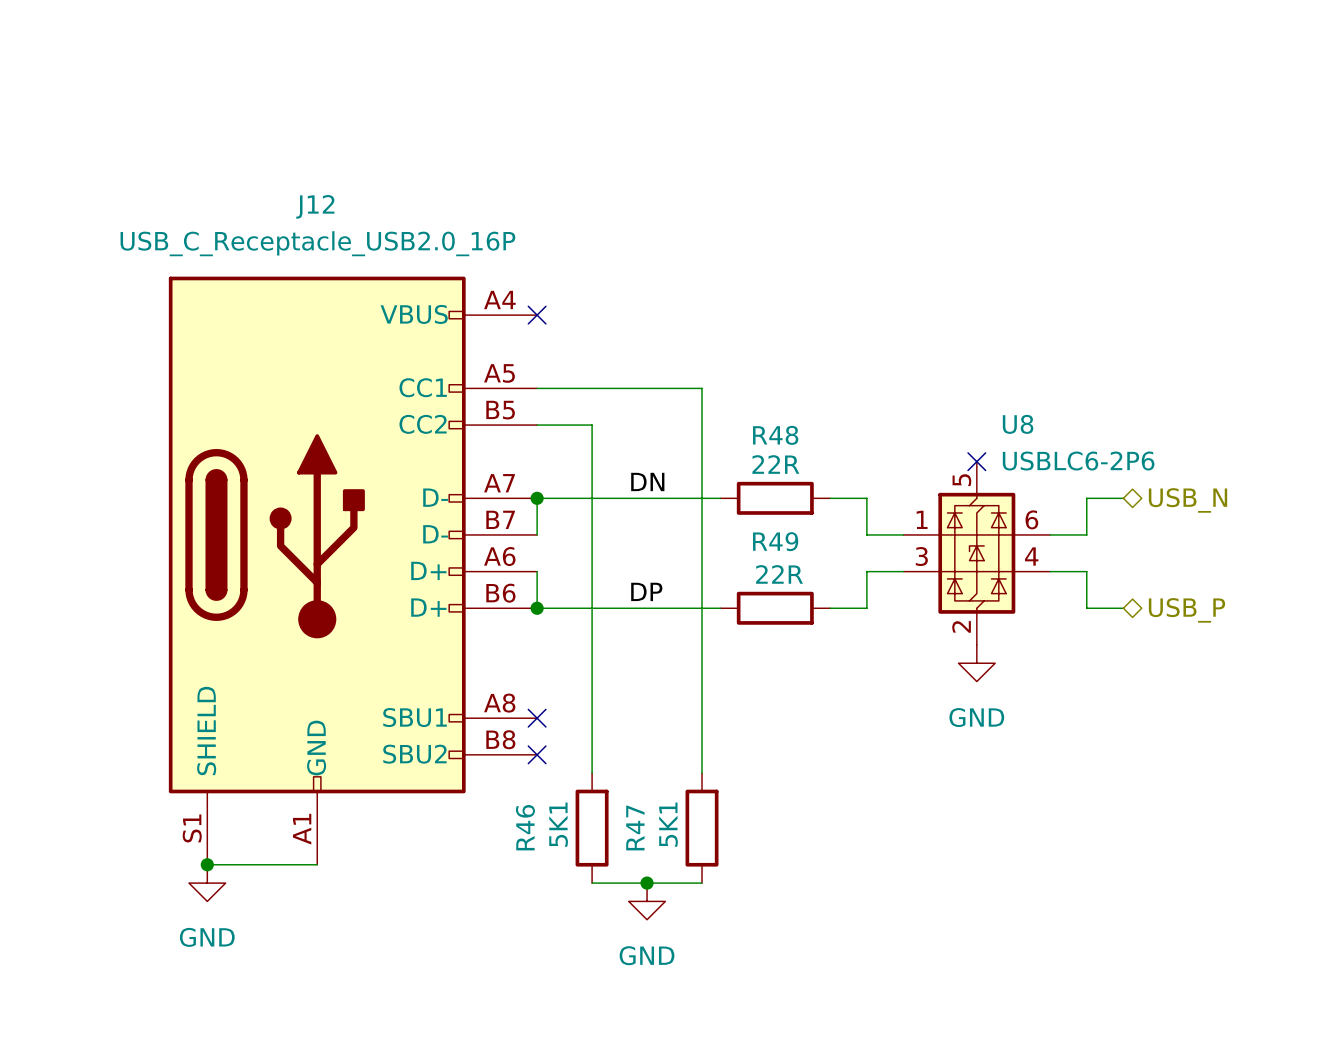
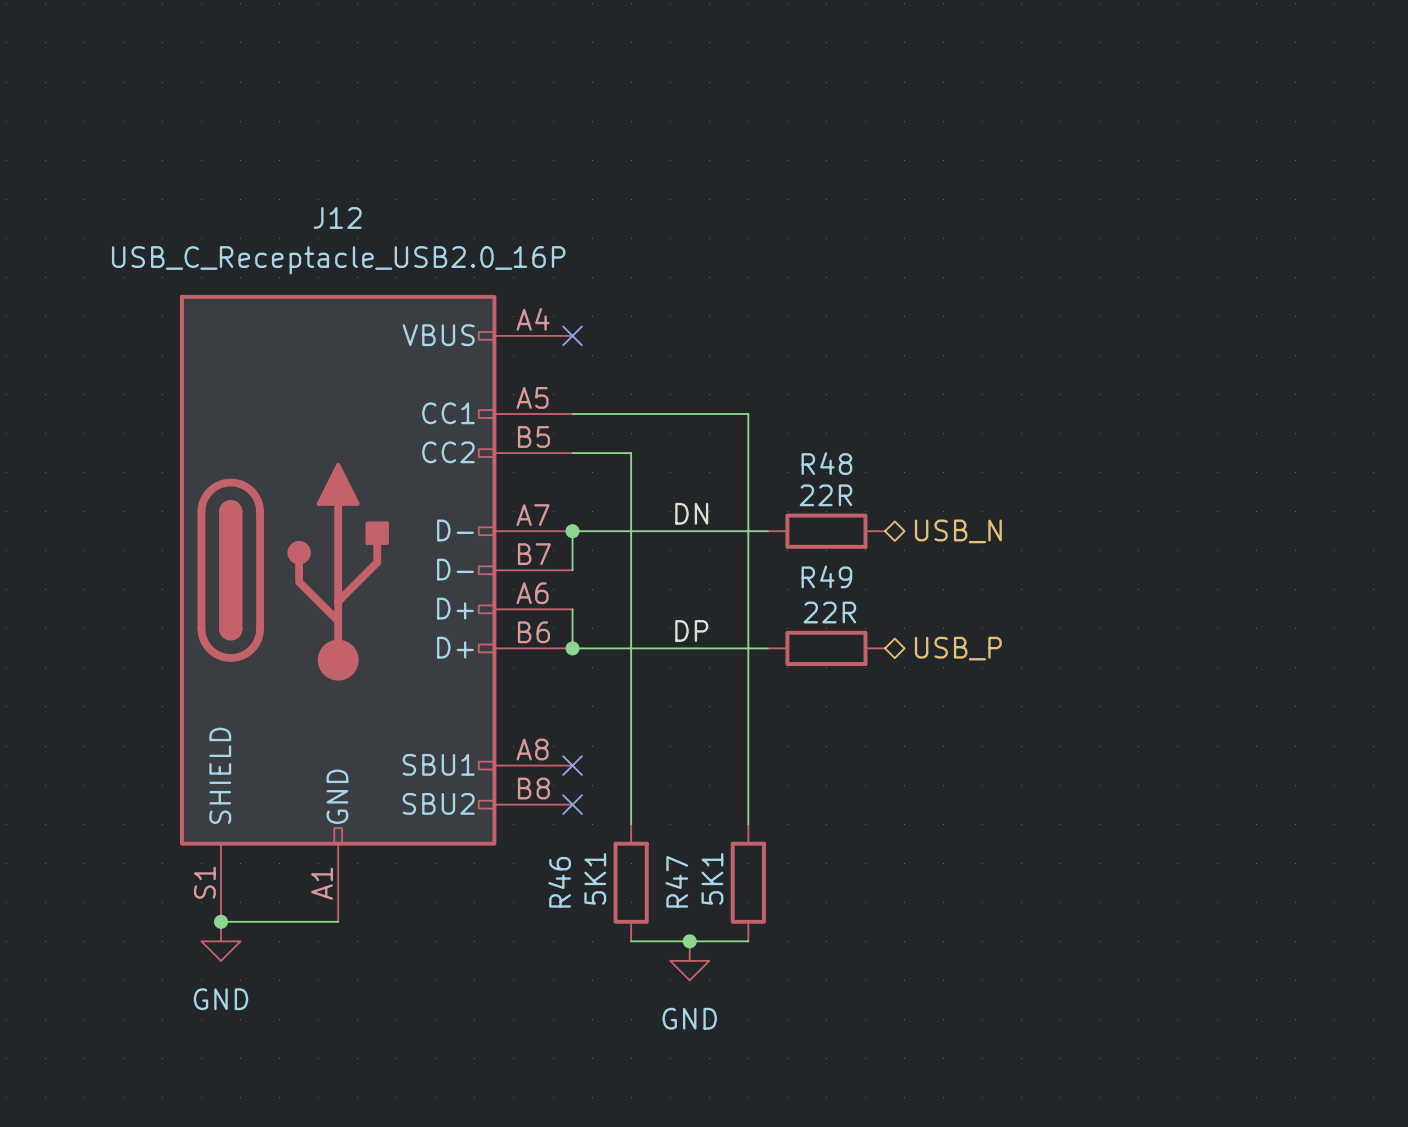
no-connect mark: (976, 461) -> none
wire: (830, 498) (866, 498) (866, 534) (903, 534) -> none
wire: (1123, 498) (1086, 498) (1086, 534) (1050, 534) -> none
hierarchical label position: USB_N (1188, 500) -> USB_N (958, 531)
U8: USBLC6-2P6 (976, 553) -> none
wire: (903, 571) (866, 571) (866, 608) (830, 608) -> none
wire: (1050, 571) (1086, 571) (1086, 608) (1123, 608) -> none
hierarchical label position: USB_P (1186, 610) -> USB_P (958, 648)
power symbol: GND (976, 663) -> none

